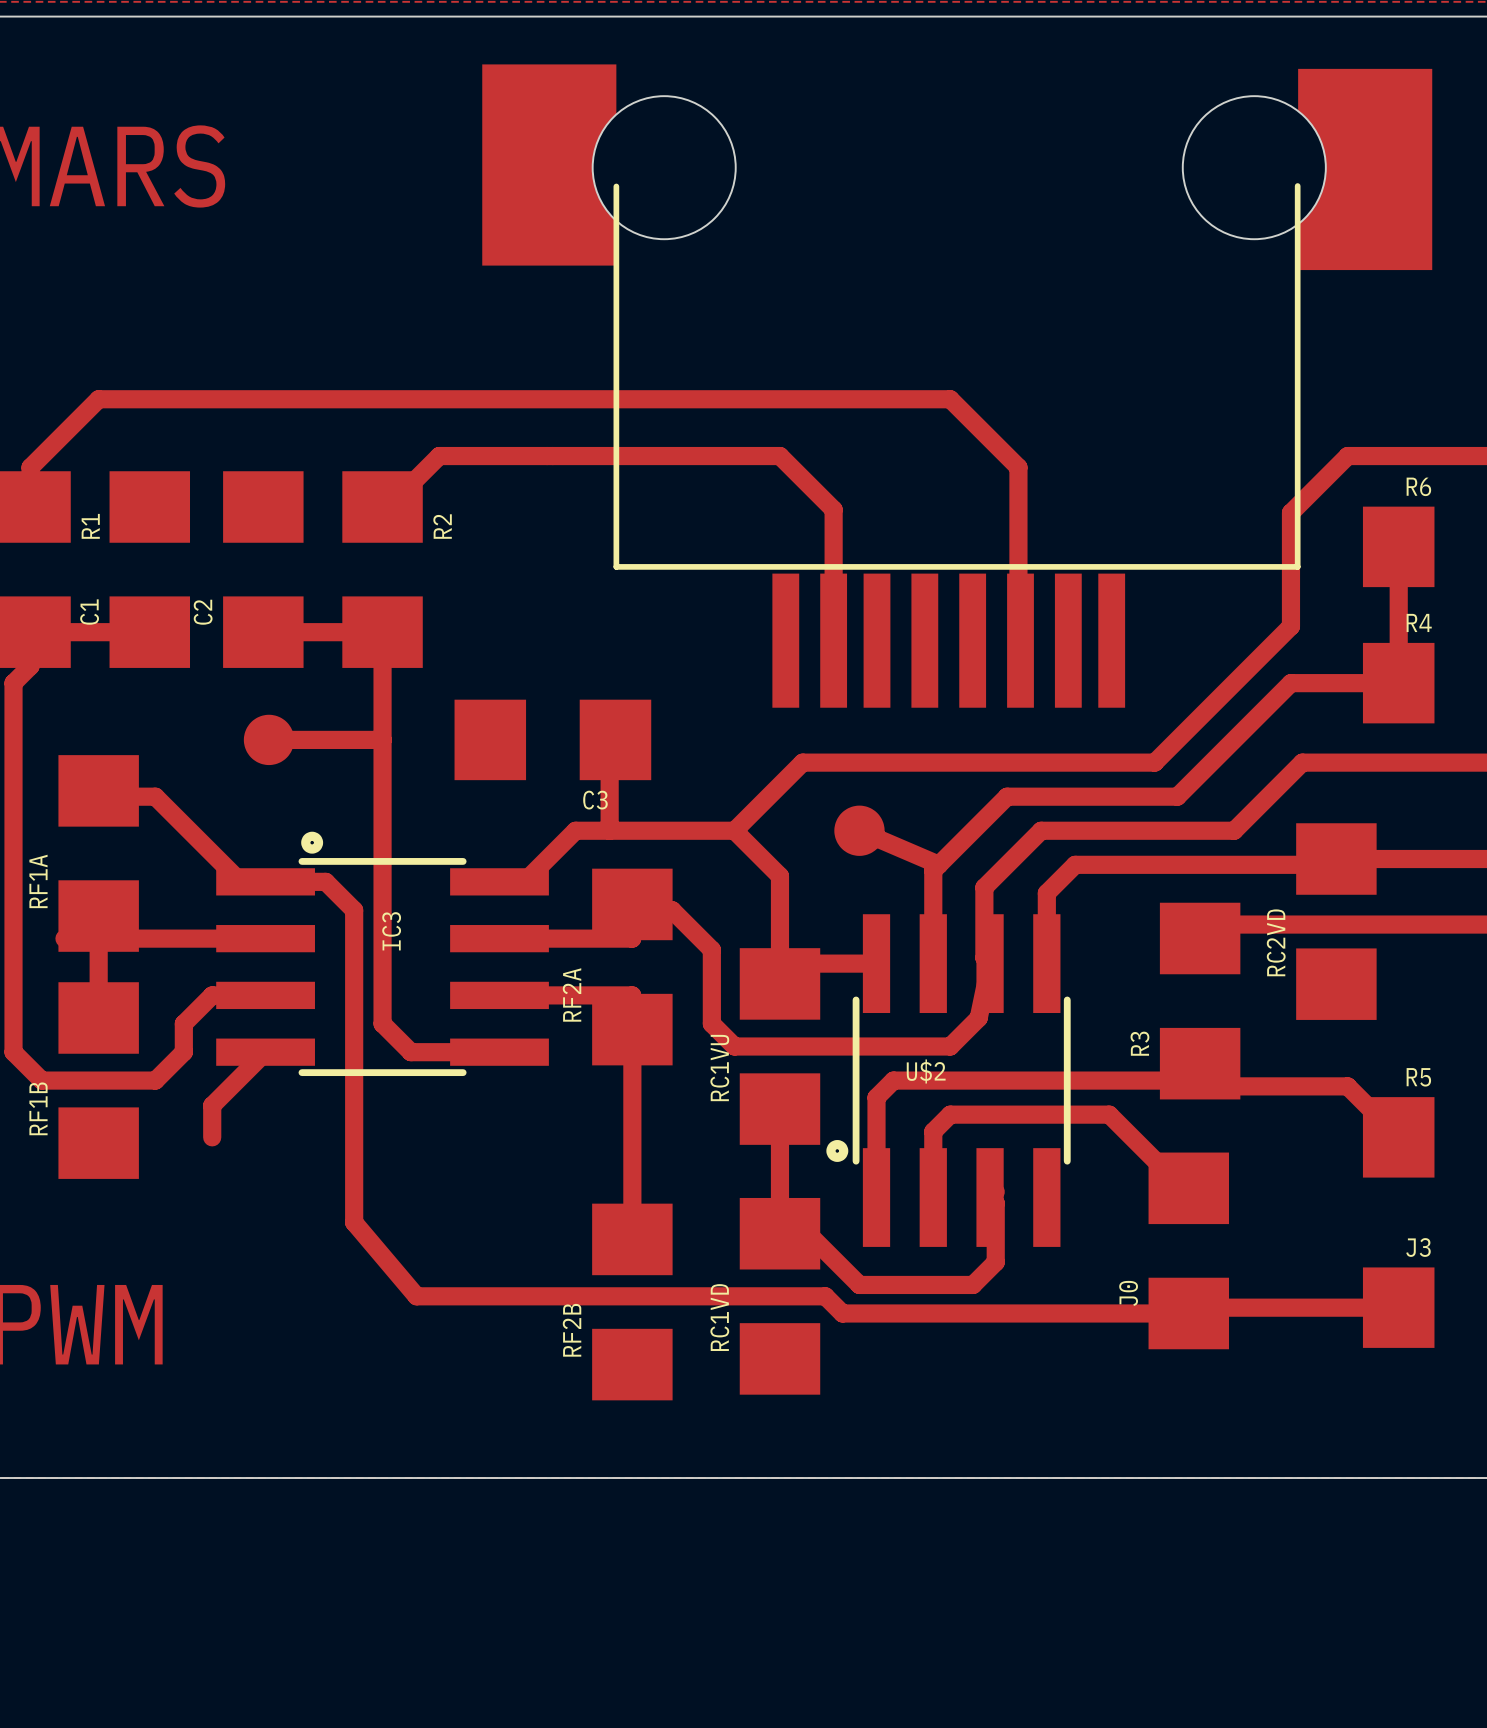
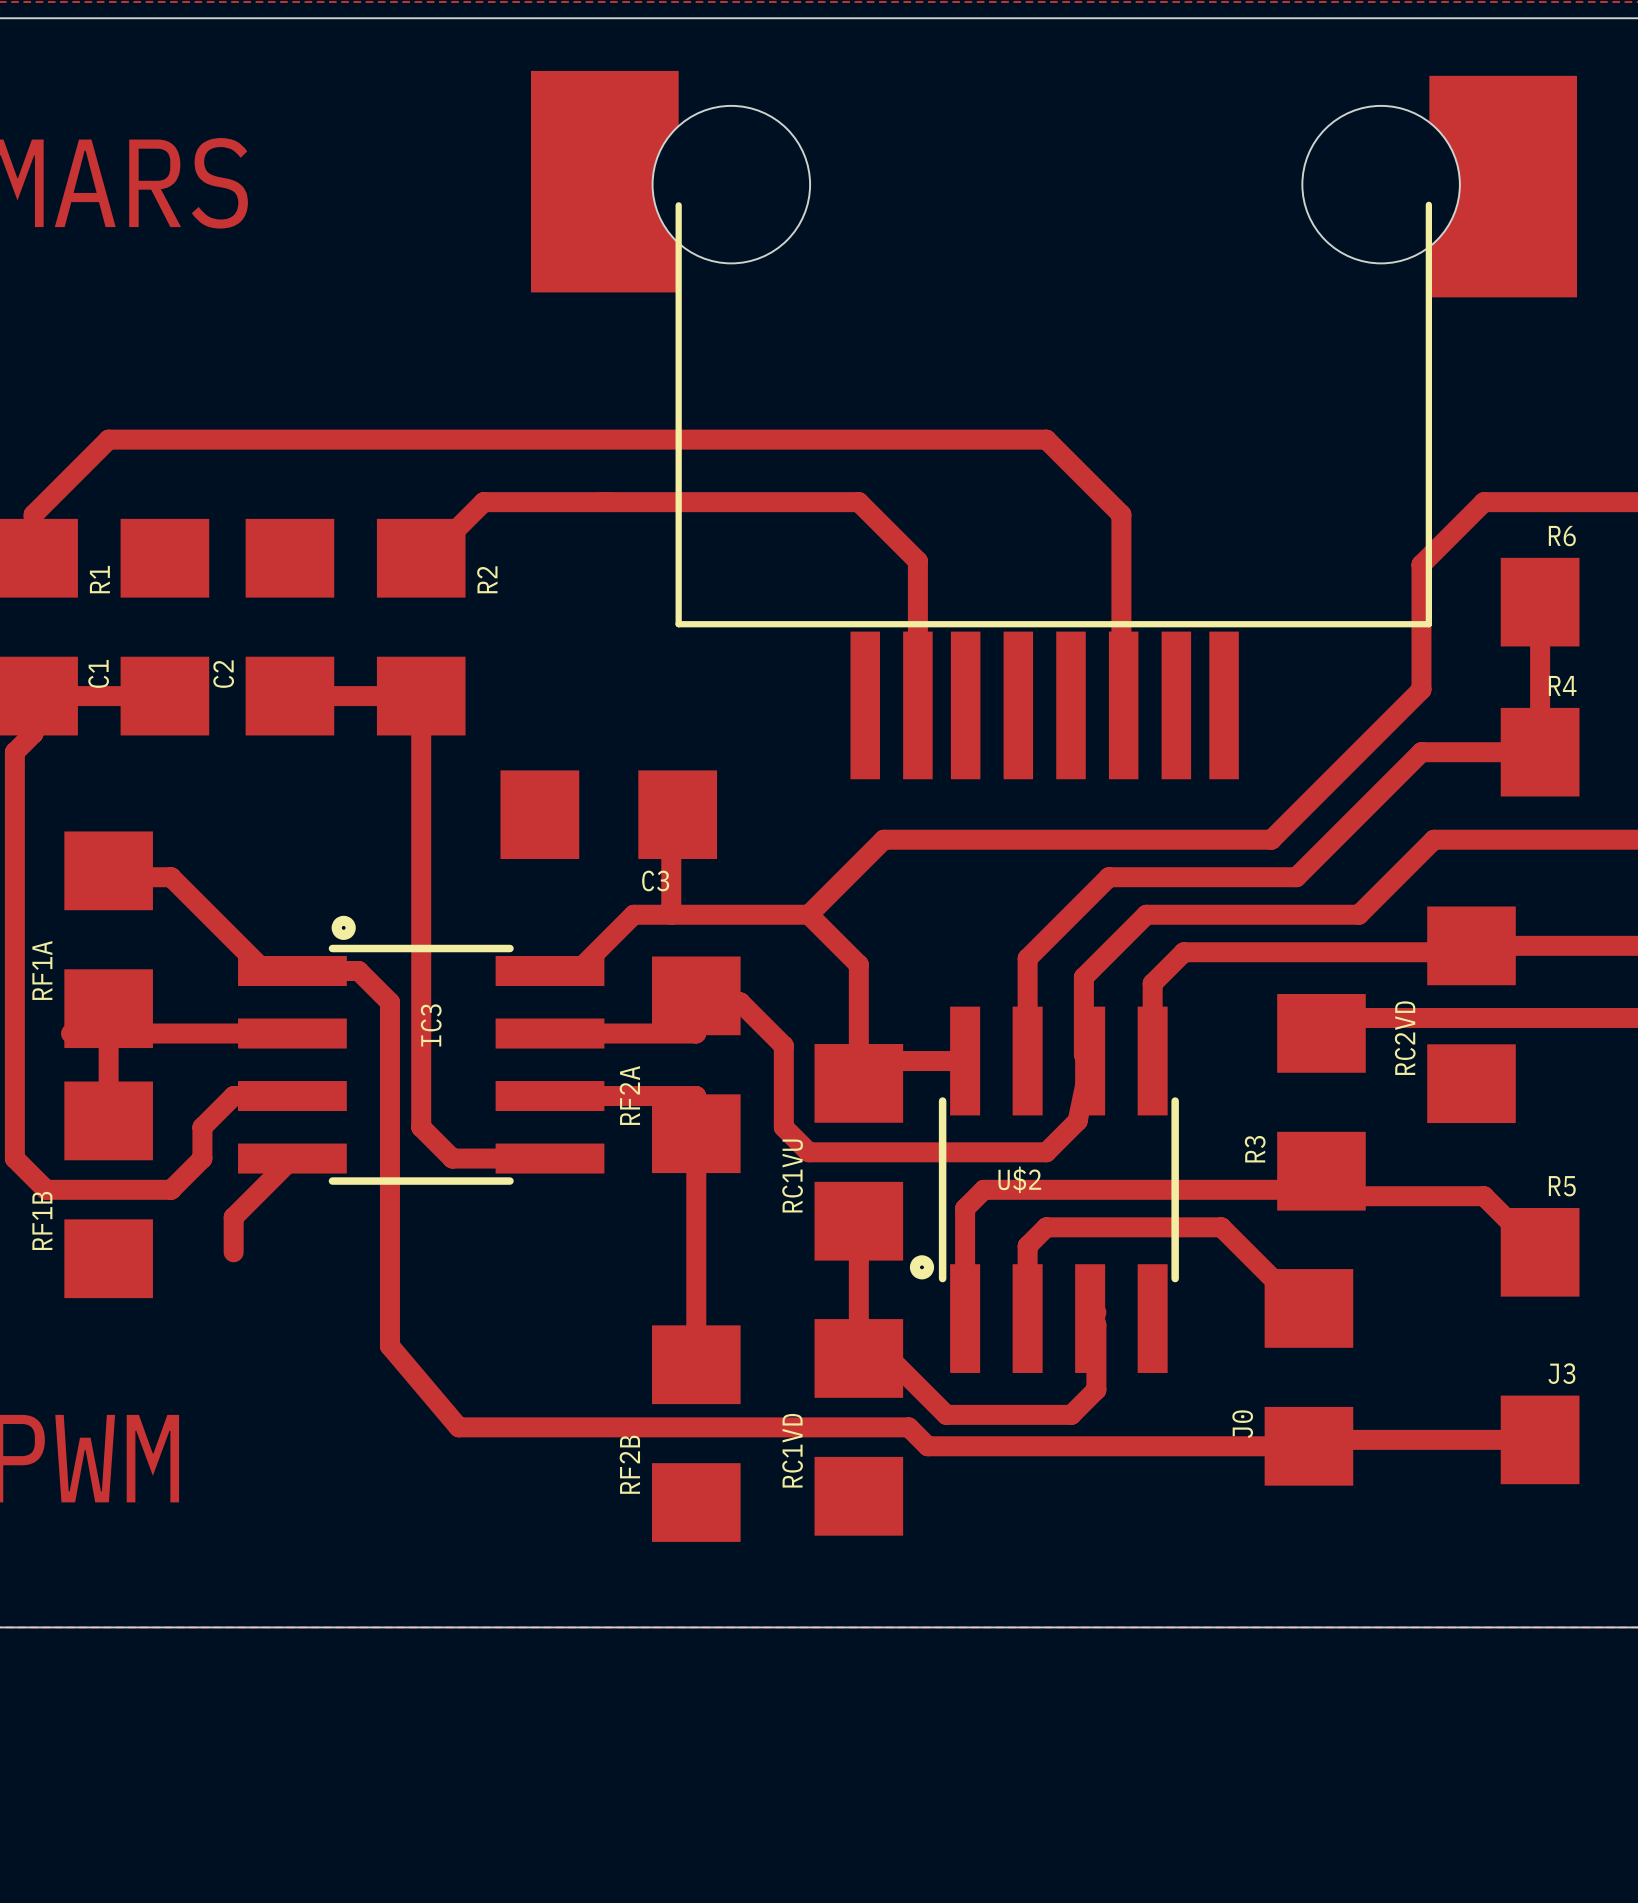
drawing: [243, 714, 295, 766] -> none
track: (269, 739) (382, 739) -> none
drawing: [834, 805, 885, 856] -> none
track: (859, 830) (938, 864) -> none

